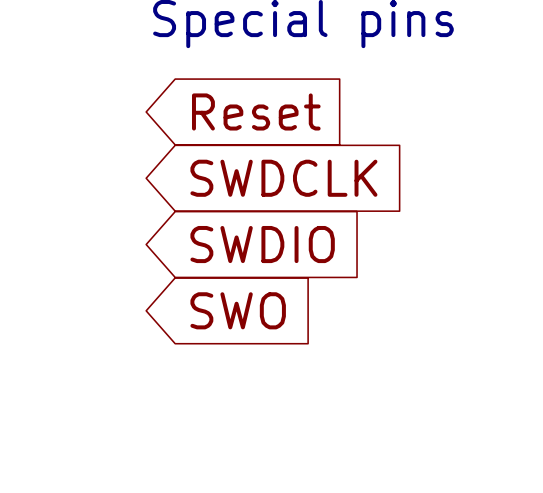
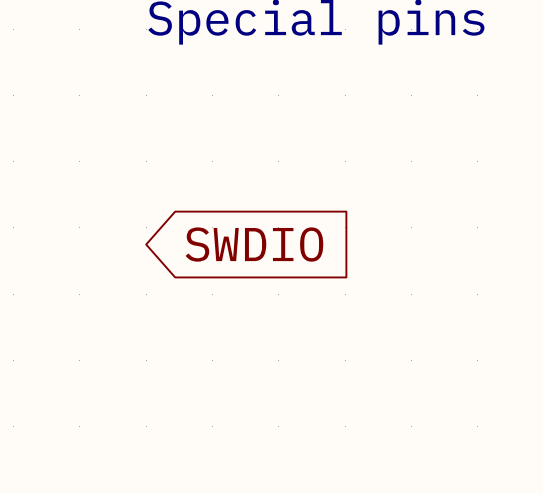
global label: Reset (256, 111) -> none
global label: SWDCLK (283, 178) -> none
global label: SWO (238, 310) -> none

